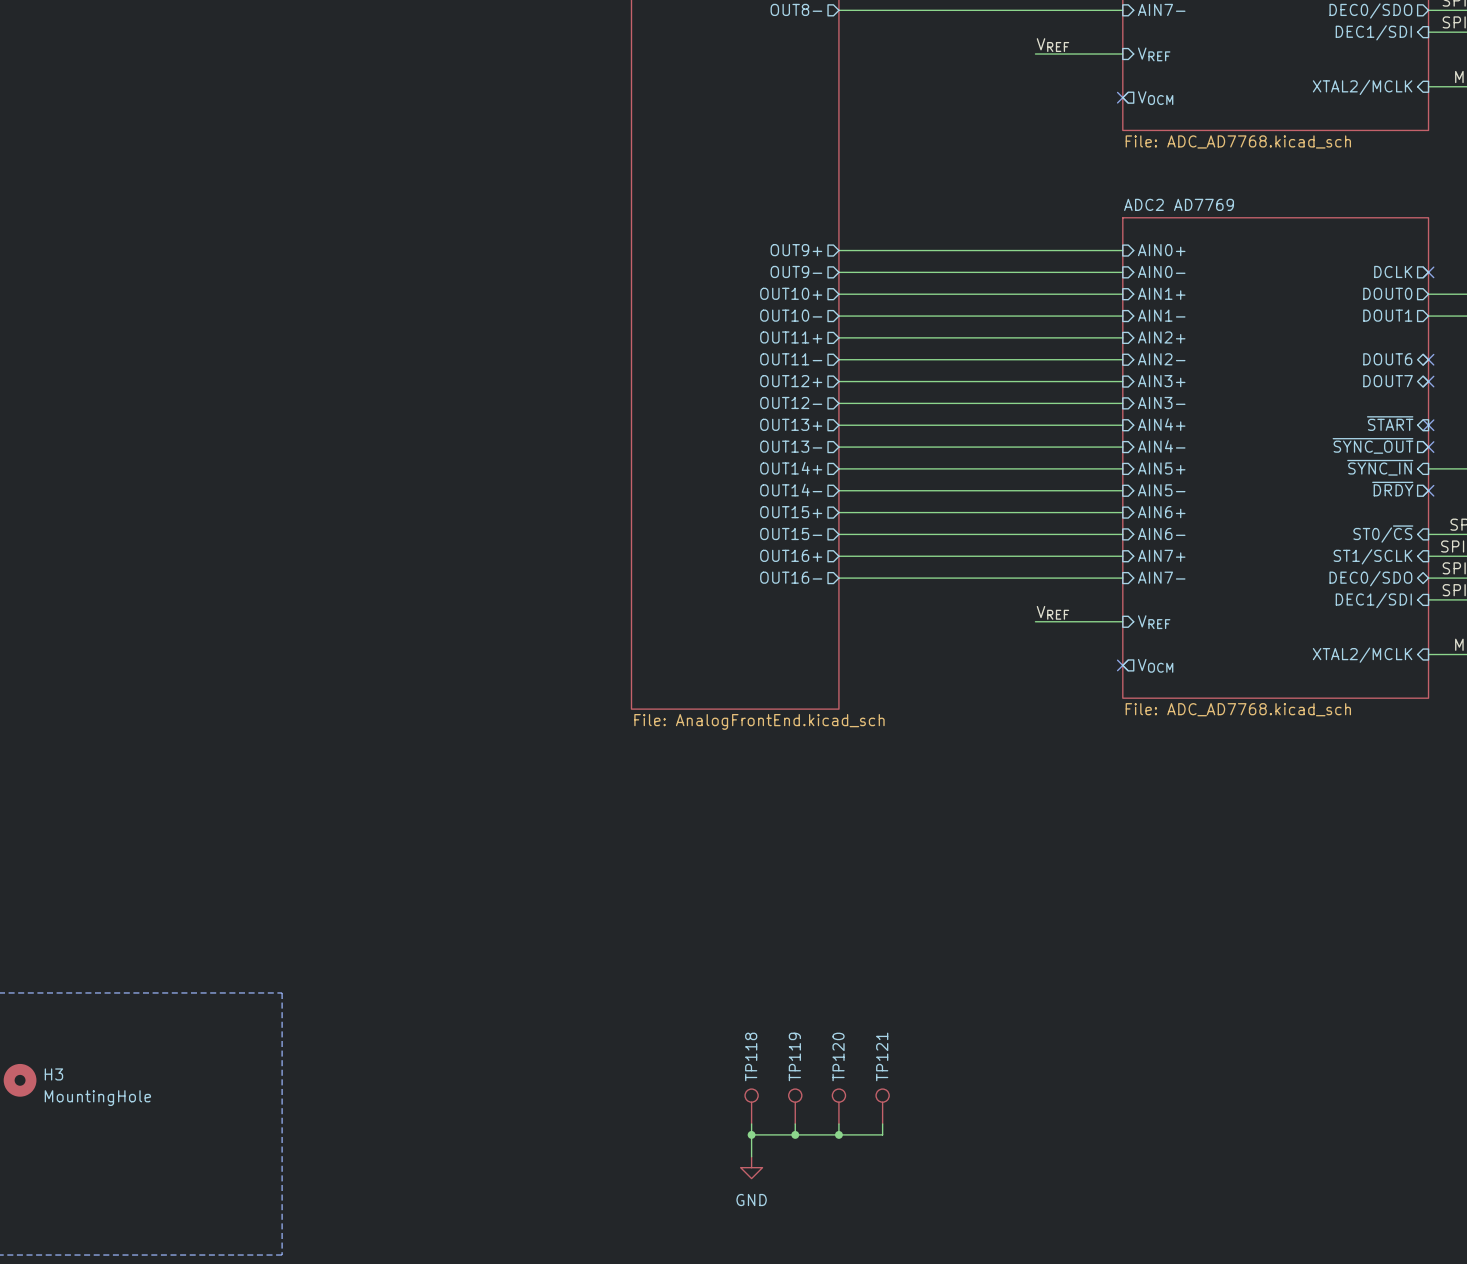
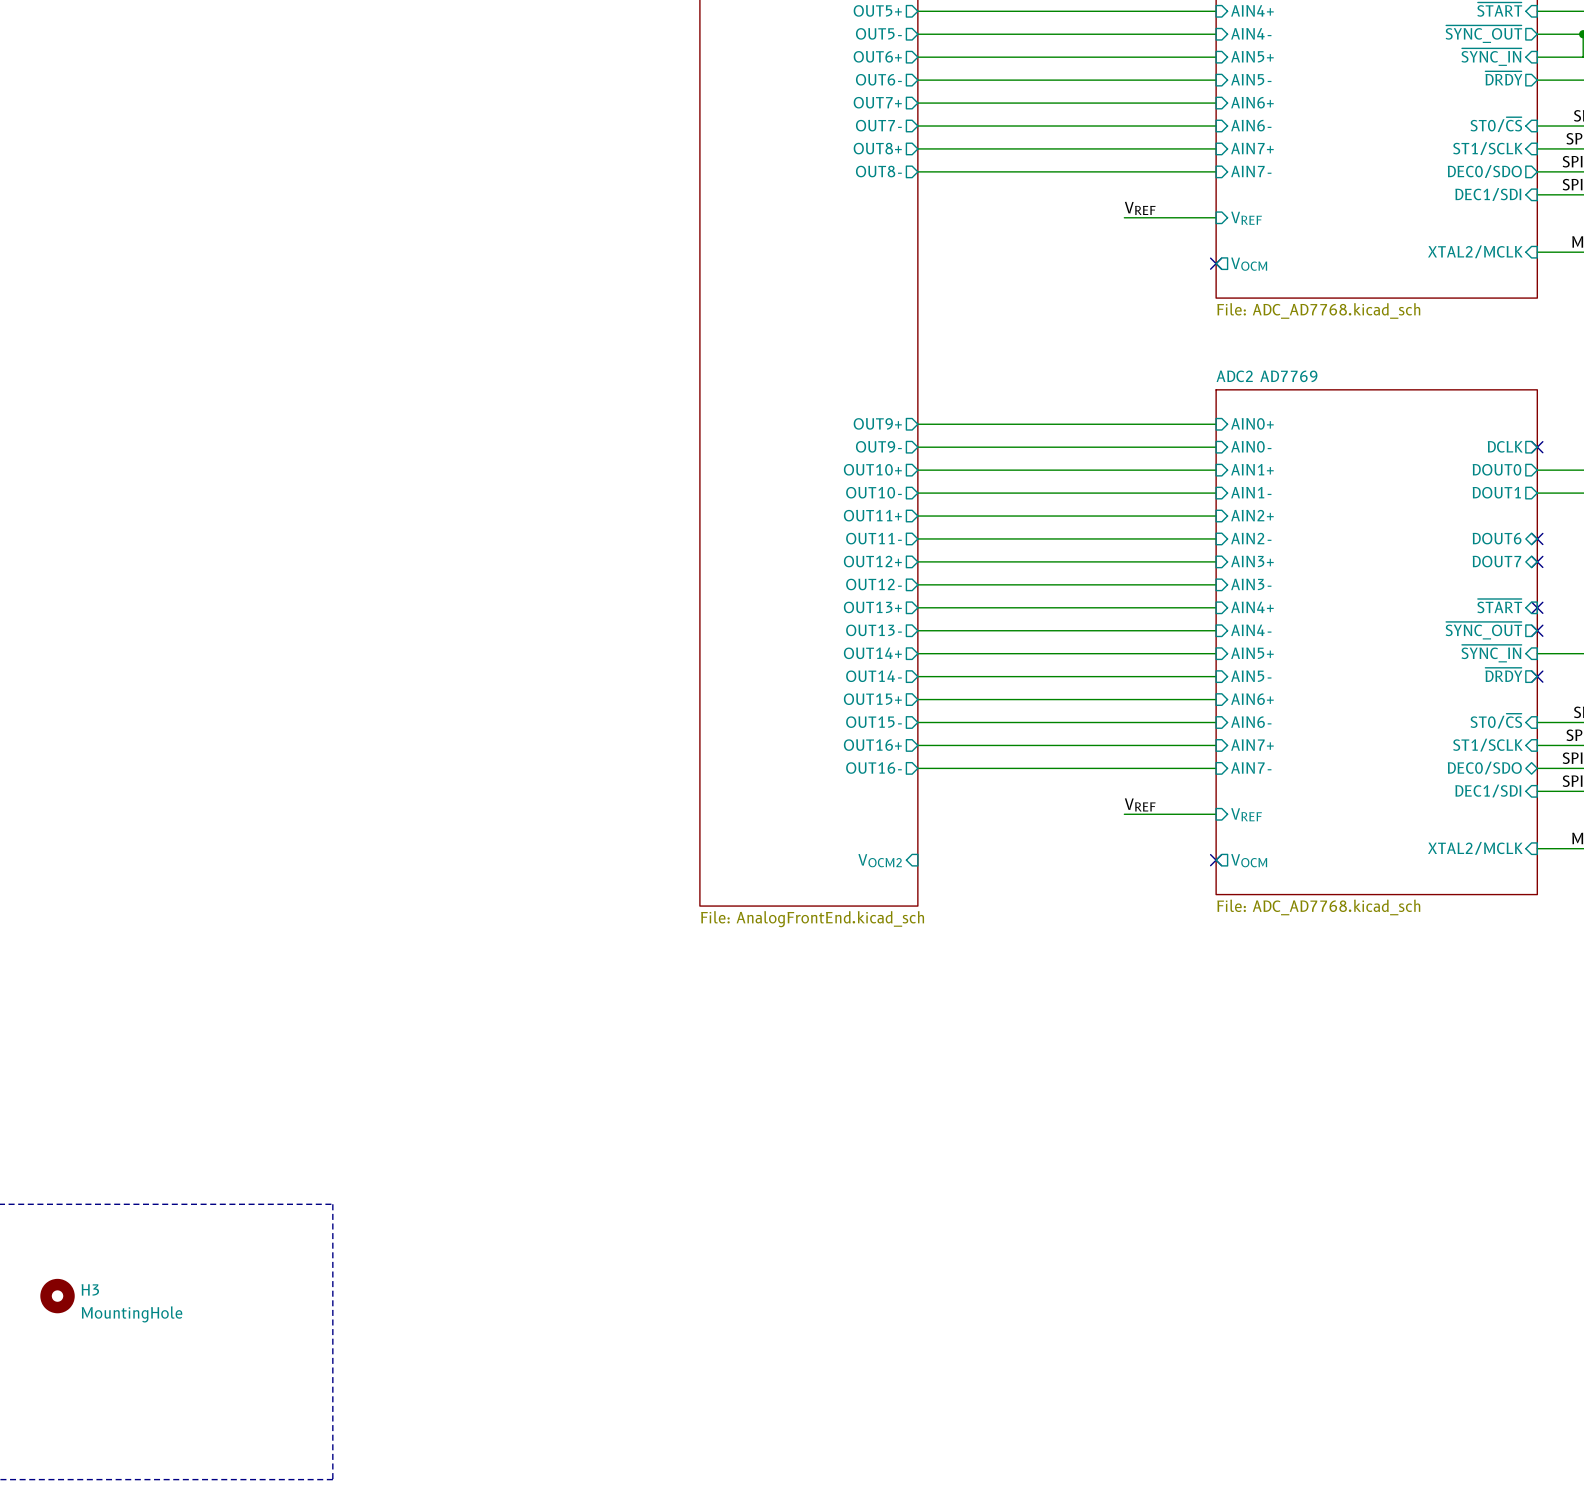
sheet pin: none -> VOCM2 (880, 860)
TP118: (751, 1106) -> none
TP119: (795, 1106) -> none
TP120: (838, 1106) -> none
TP121: (882, 1106) -> none
wire: (751, 1124) (751, 1156) -> none
wire: (795, 1124) (795, 1134) -> none
wire: (838, 1124) (838, 1134) -> none
wire: (882, 1124) (882, 1134) (751, 1134) -> none
junction: (751, 1134) -> none
junction: (795, 1134) -> none
junction: (838, 1134) -> none
power symbol: GND (751, 1167) -> none

